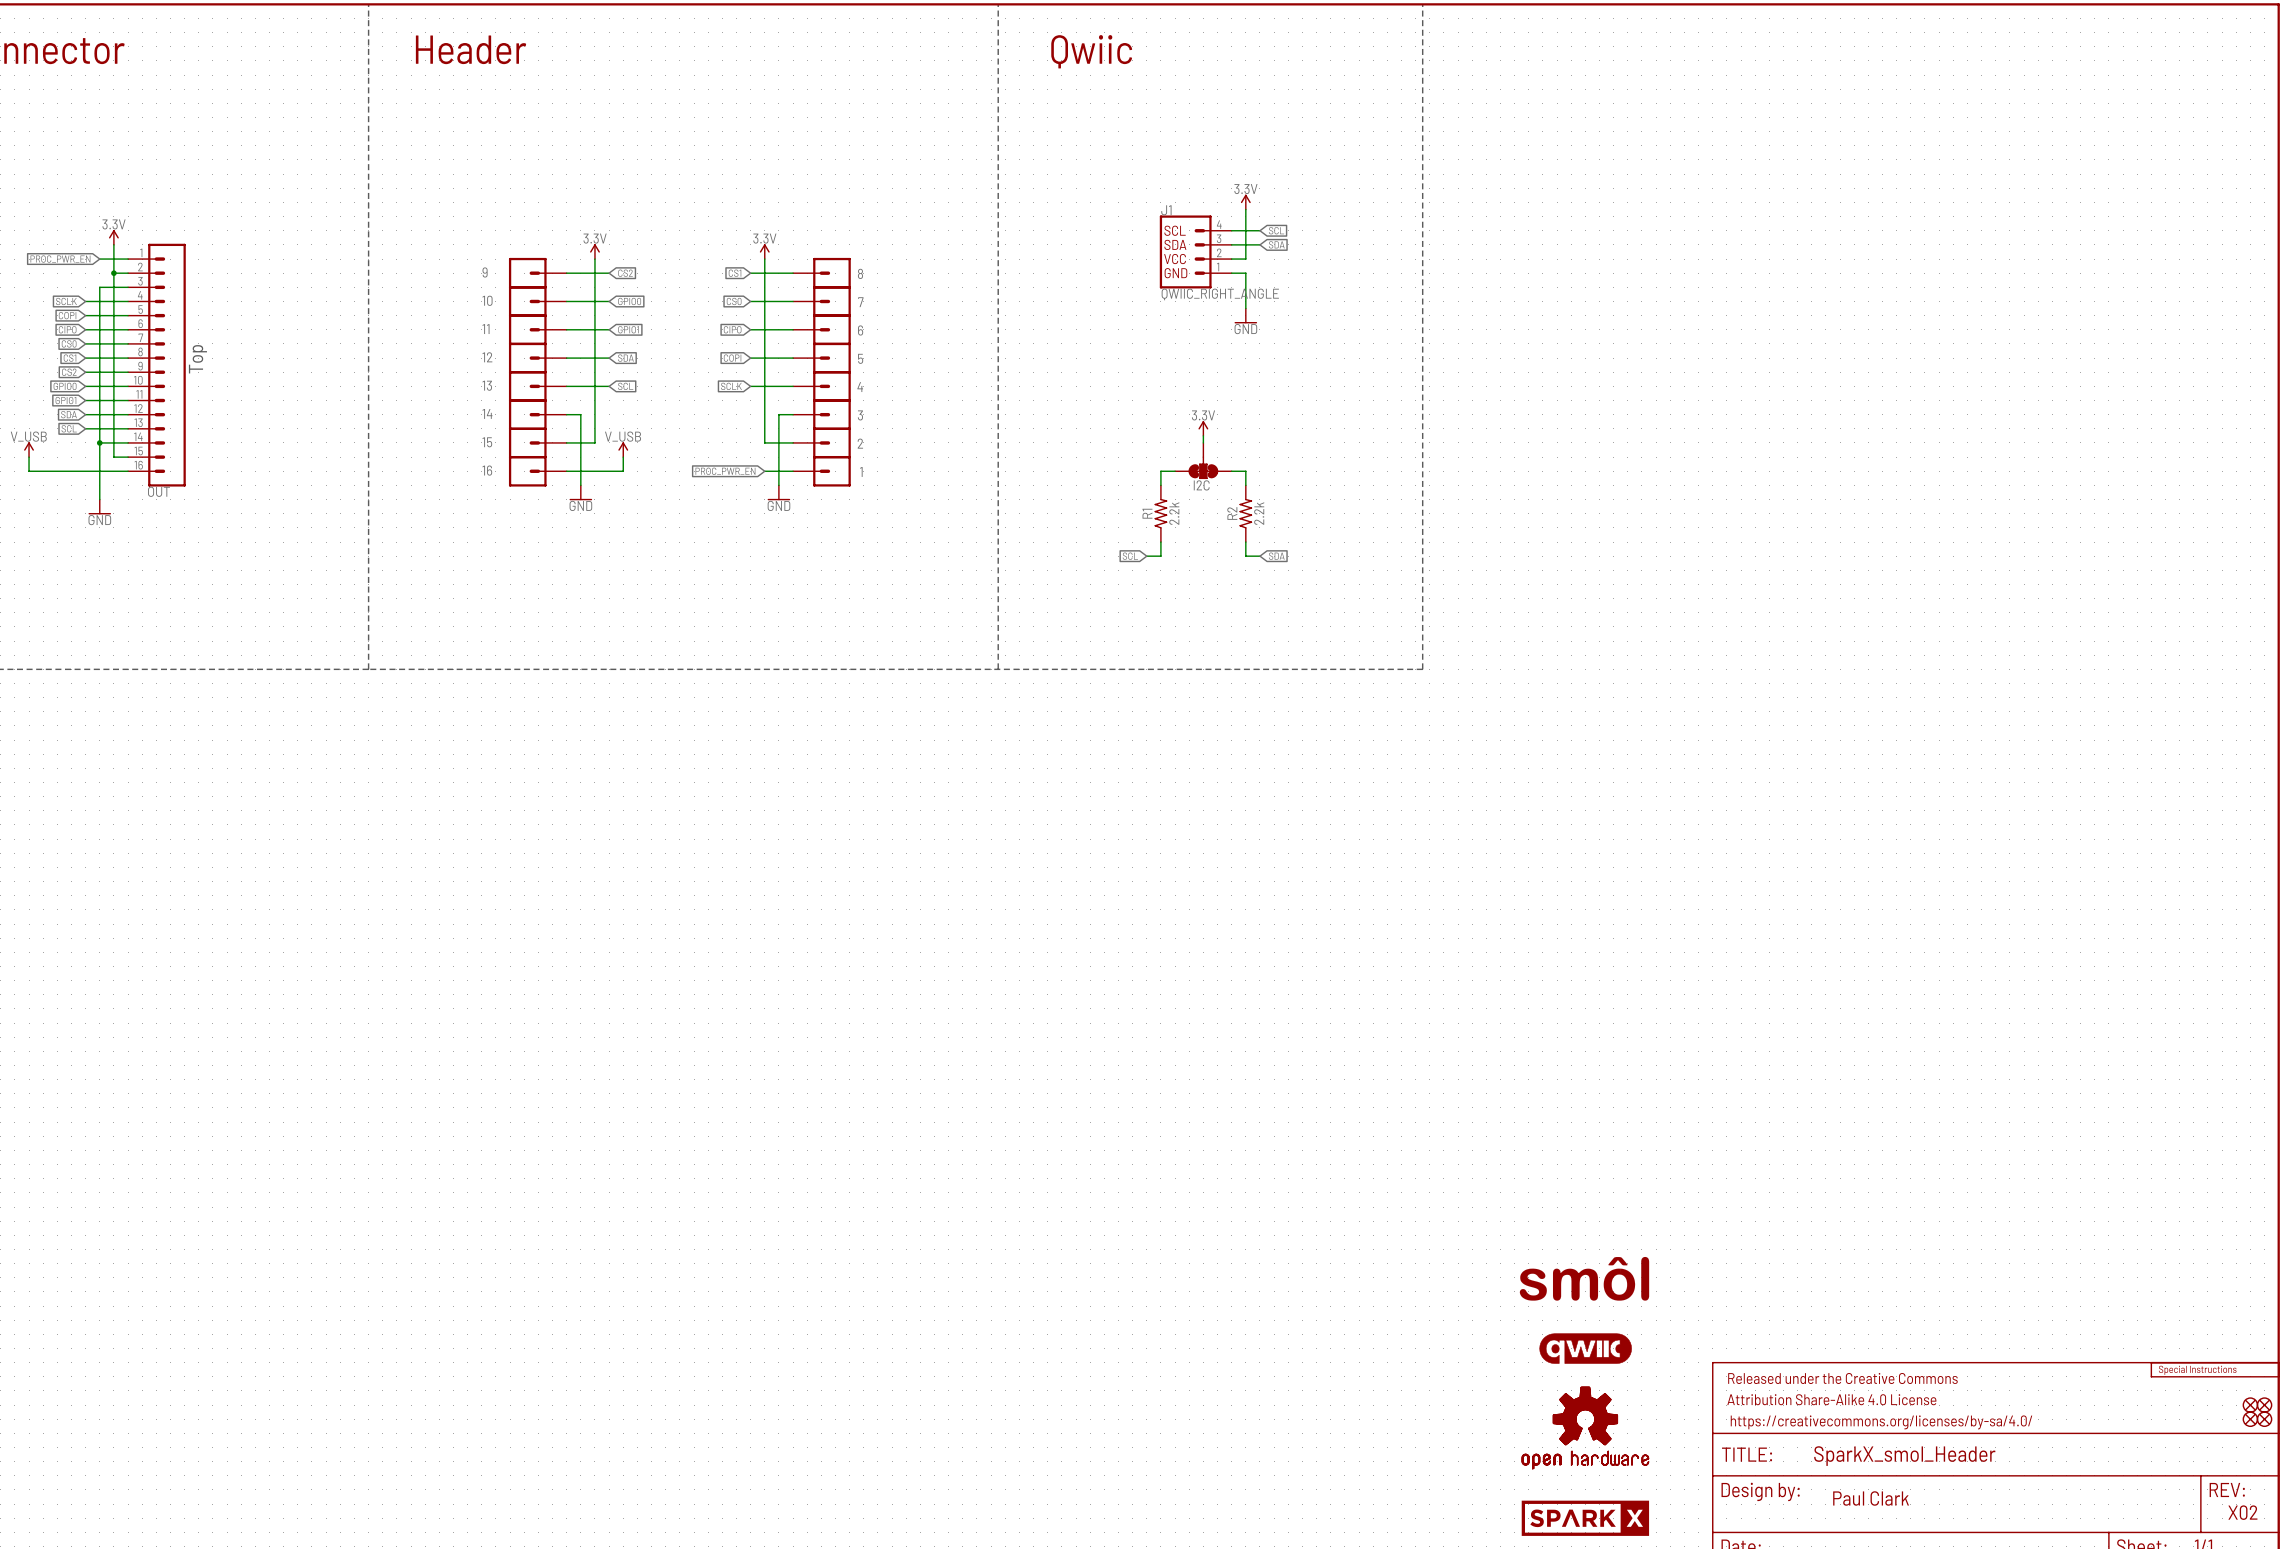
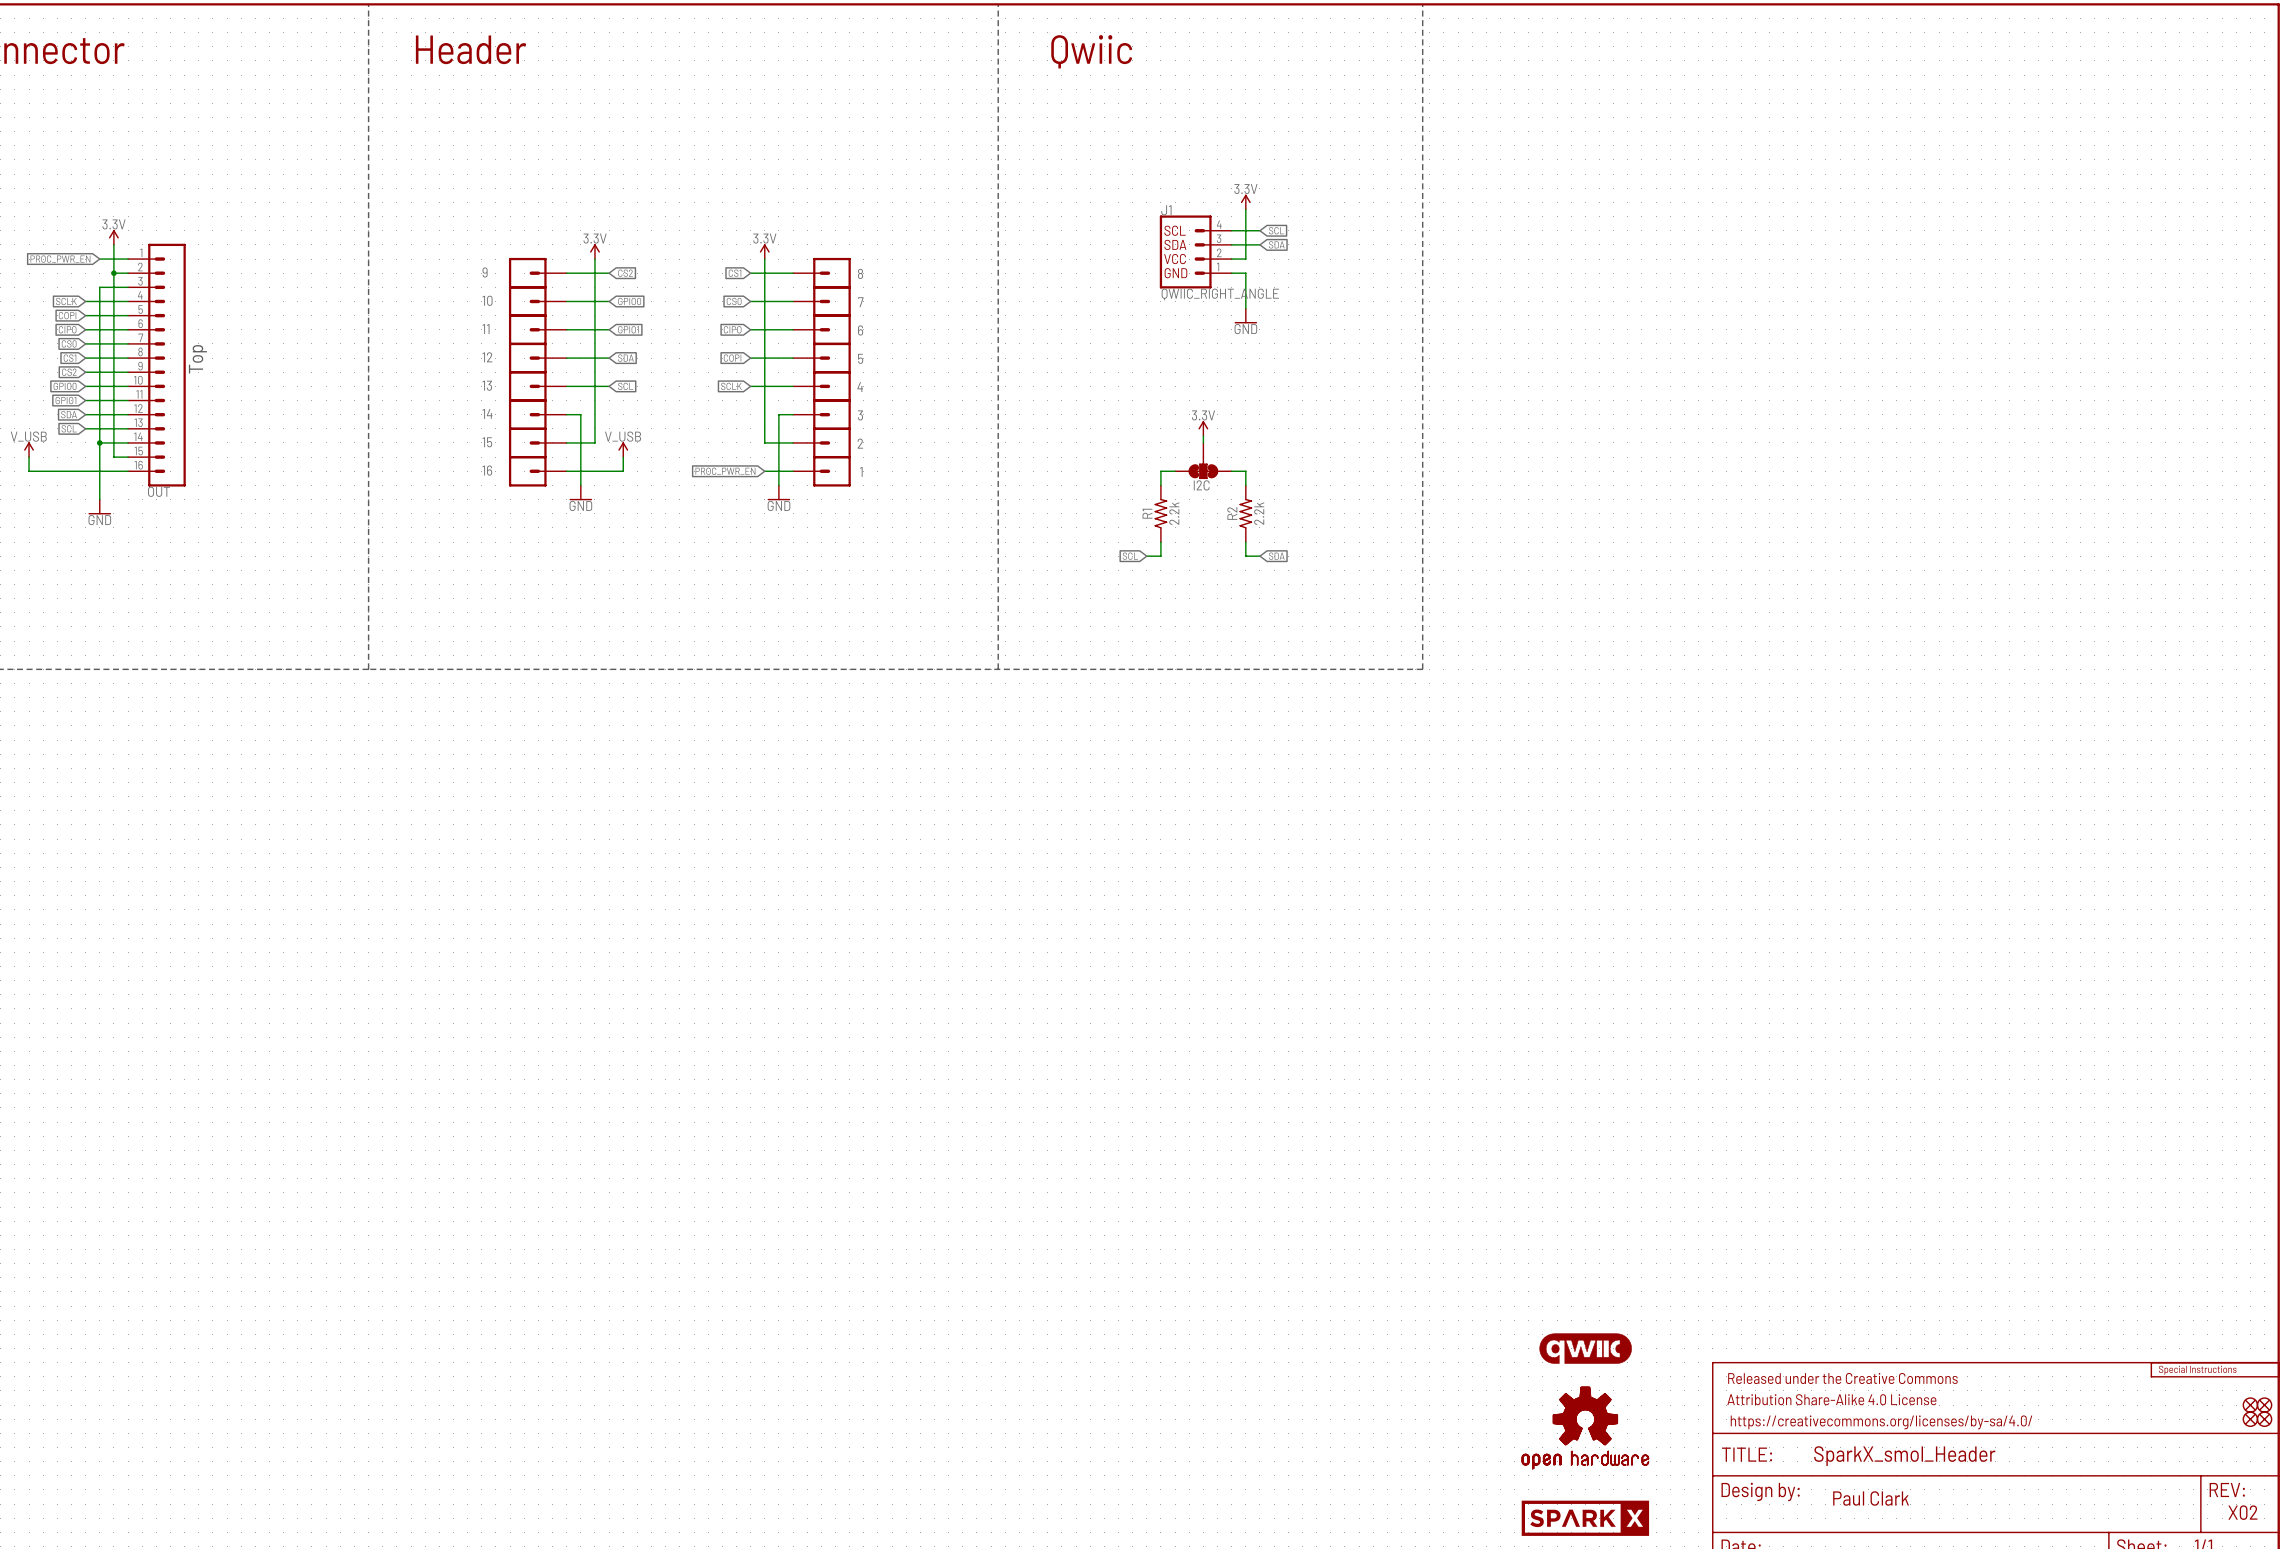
part: (1584, 1278) -> none

